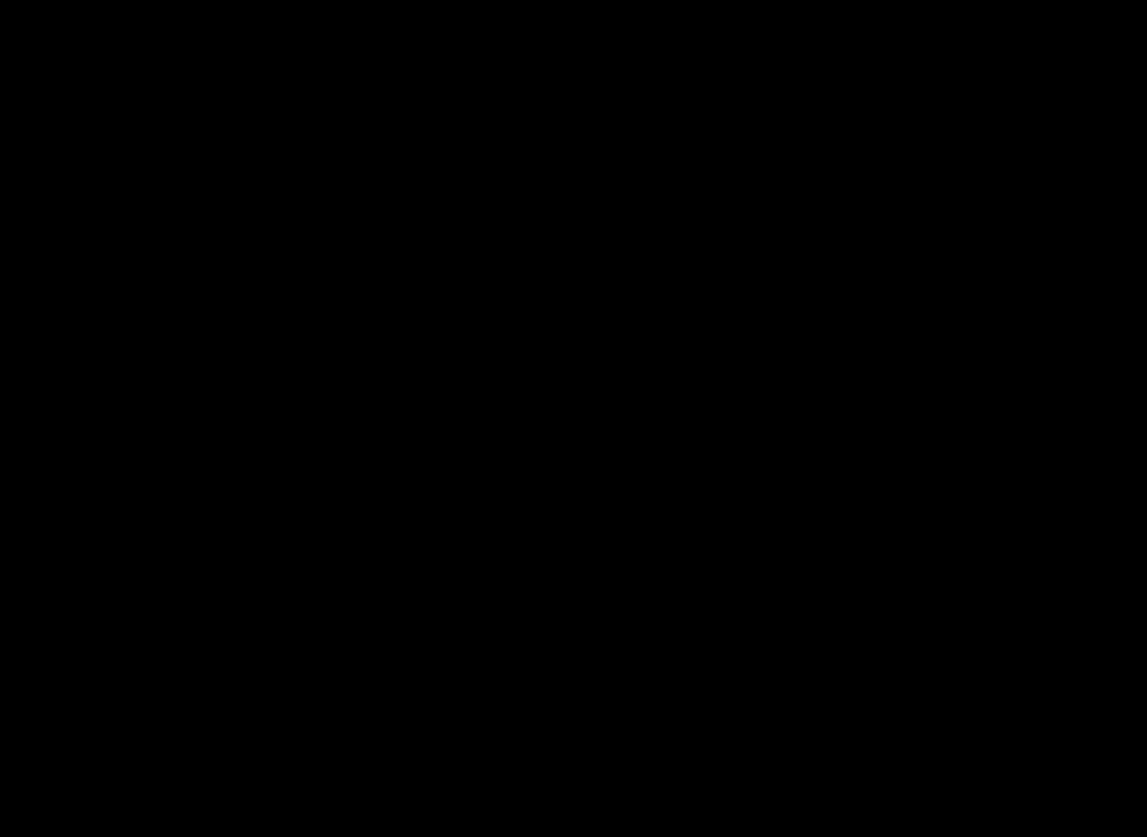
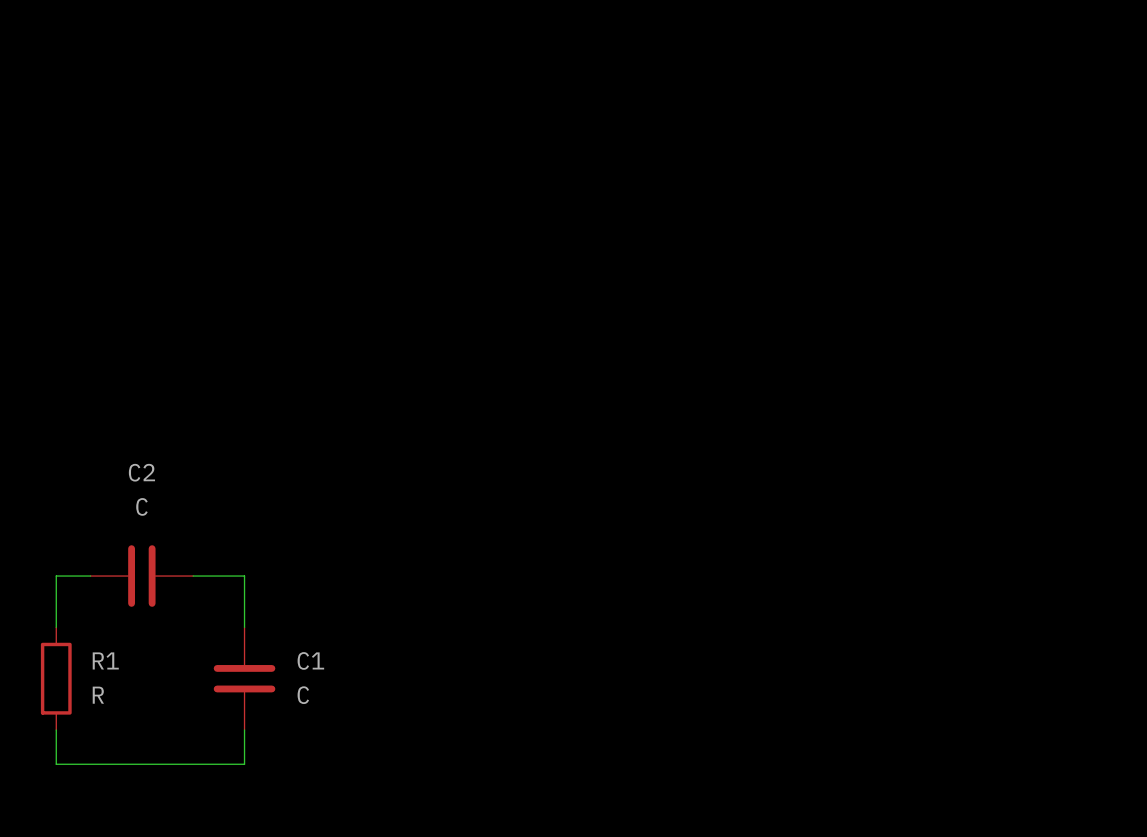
wire: none -> (90, 576) (56, 576) (56, 627)
C2: none -> C (141, 576)
wire: none -> (193, 576) (244, 576) (244, 627)
R1: none -> R (56, 678)
C1: none -> C (244, 678)
wire: none -> (56, 730) (56, 764) (244, 764) (244, 730)

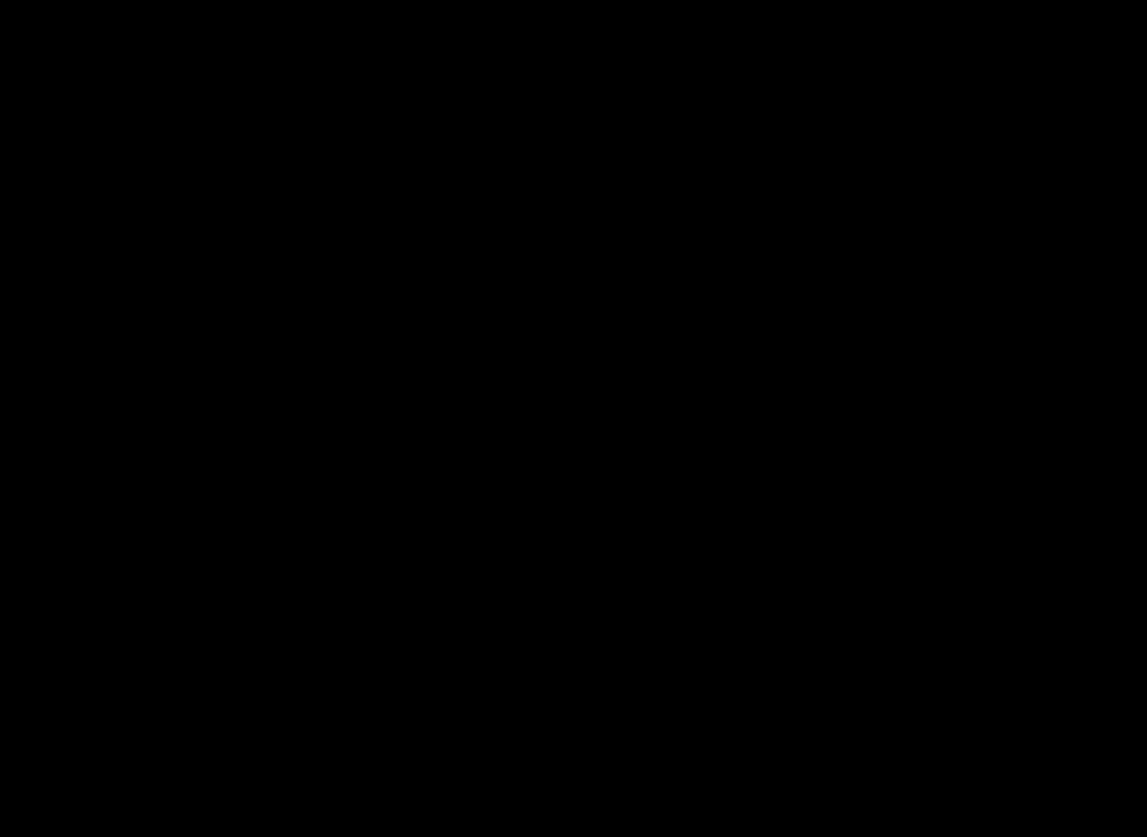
wire: (90, 576) (56, 576) (56, 627) -> none
C2: C (141, 576) -> none
wire: (193, 576) (244, 576) (244, 627) -> none
R1: R (56, 678) -> none
C1: C (244, 678) -> none
wire: (56, 730) (56, 764) (244, 764) (244, 730) -> none

